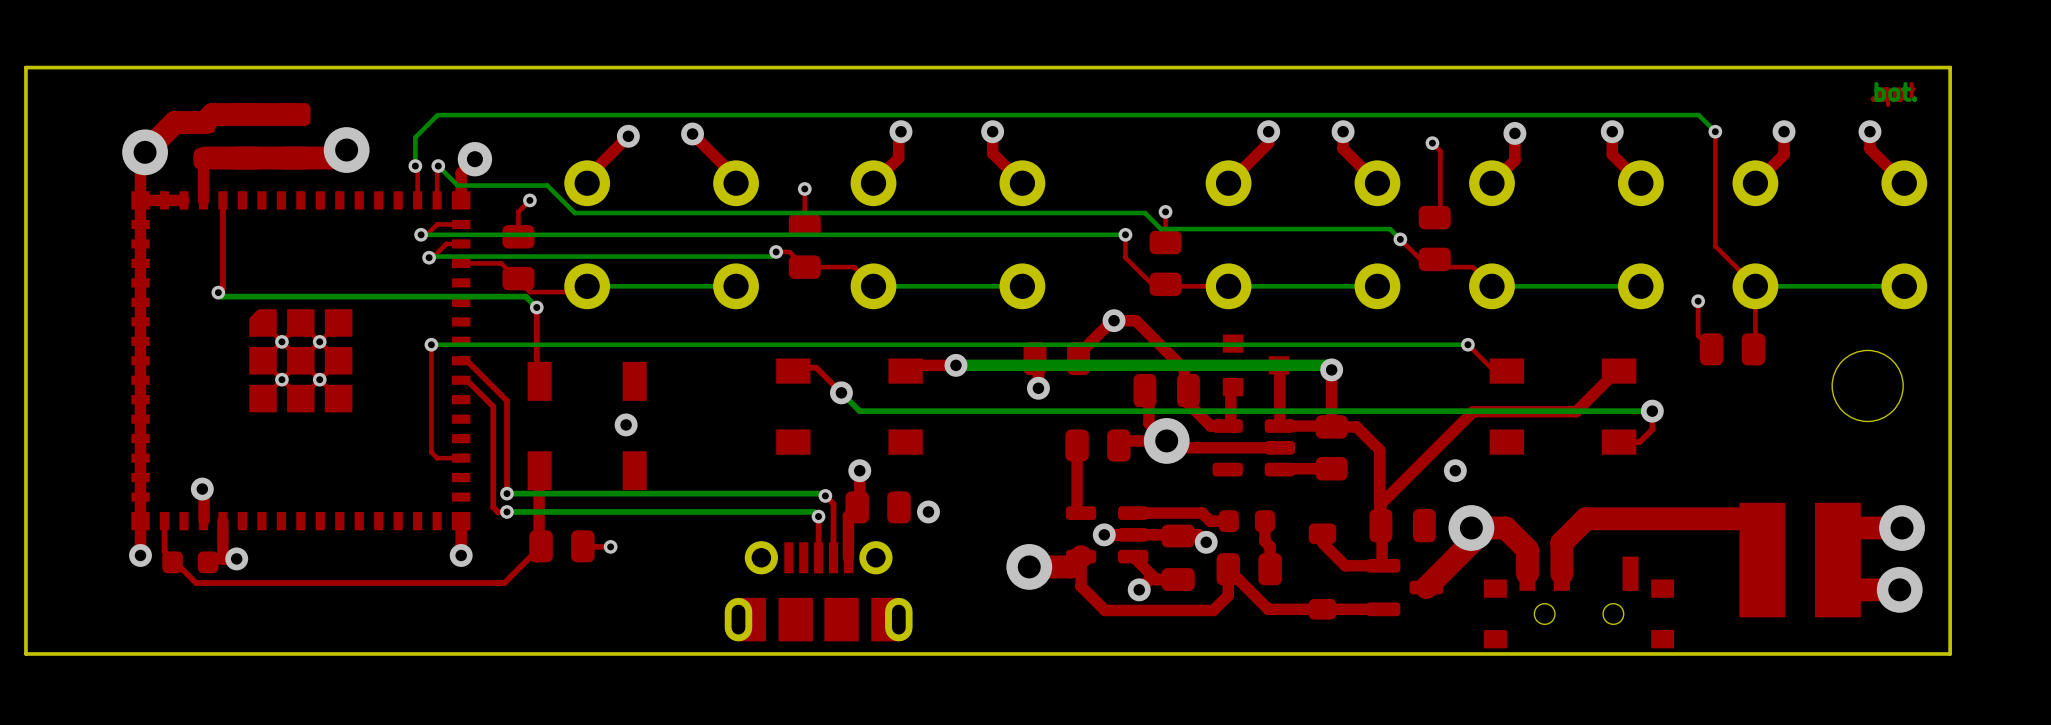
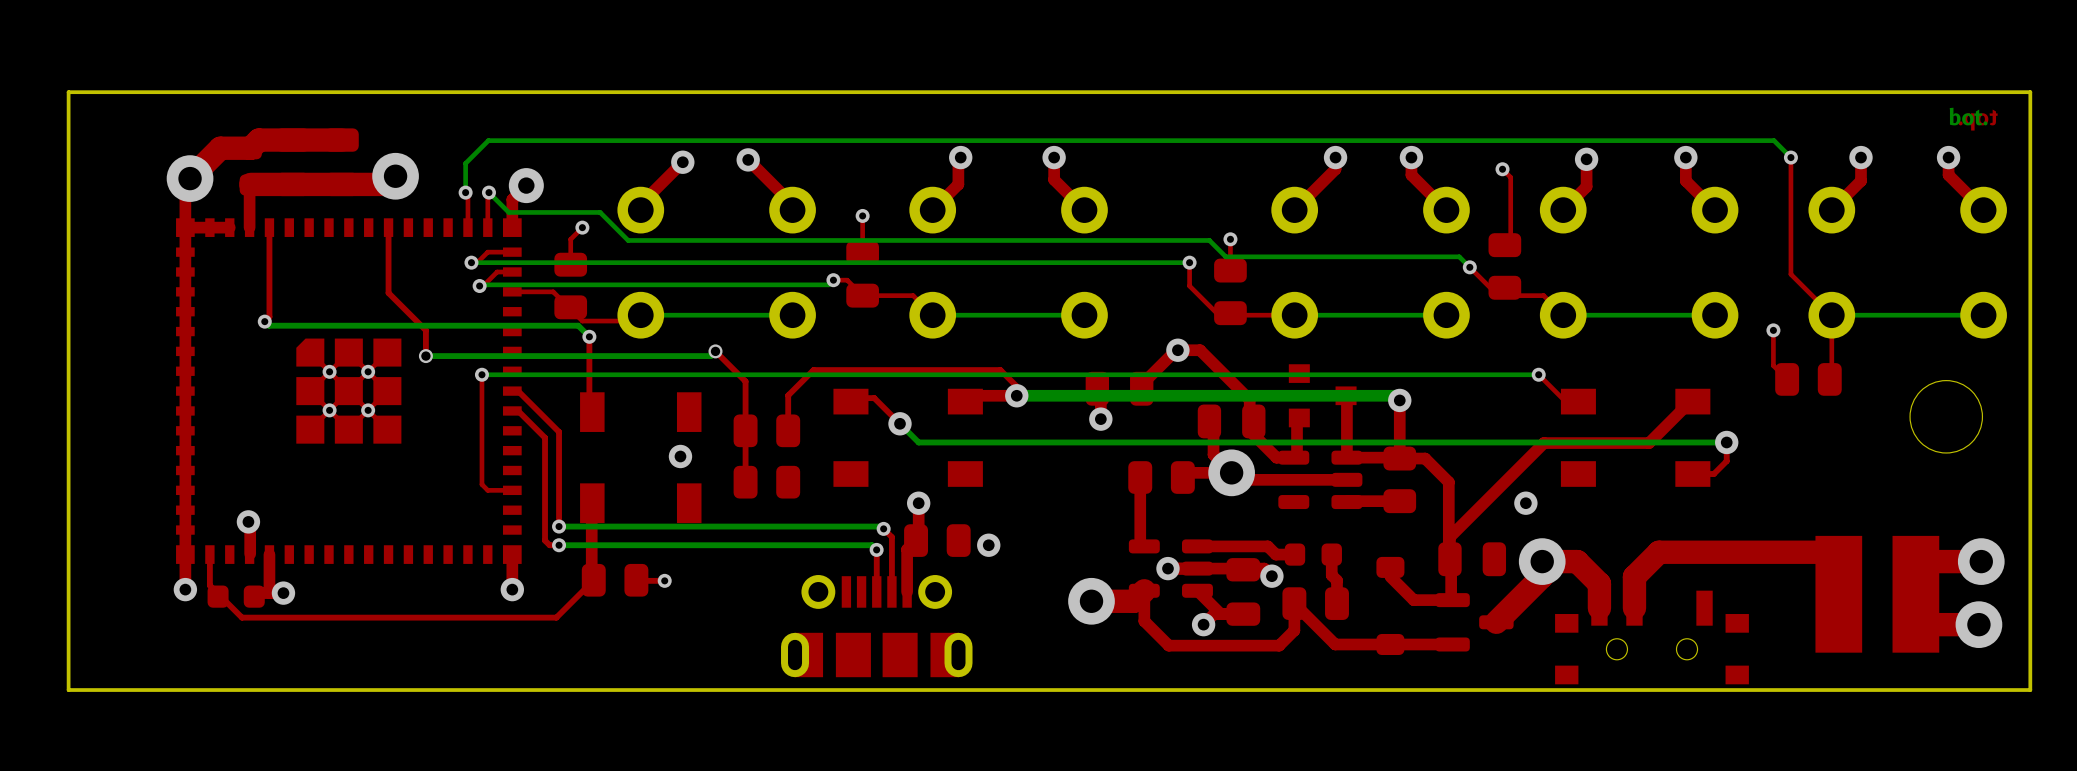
top track: none -> (388, 227) (388, 293) (425, 330) (425, 356)
top track: none -> (715, 351) (745, 381) (745, 482)
bottom track: none -> (715, 351) (710, 356) (423, 356)
via: none -> (715, 351)
via: none -> (425, 356)
top track: none -> (1016, 395) (1016, 386) (1000, 370) (813, 370) (788, 395) (788, 430)
part: none -> (766, 430)
part: none -> (766, 482)

